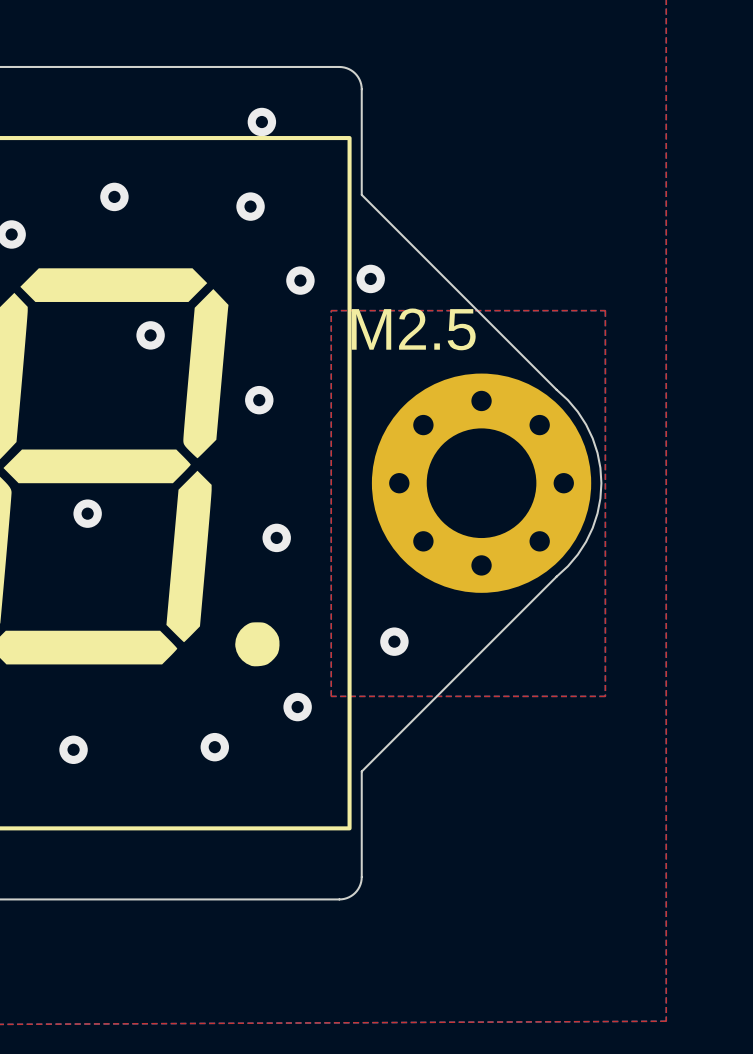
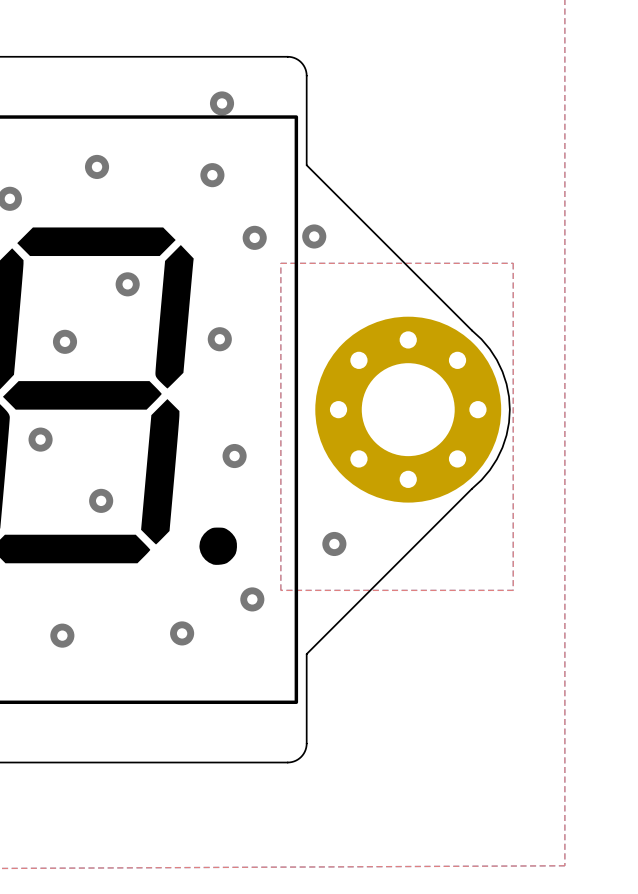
text: M2.5 (413, 329) -> none
via: none -> (65, 341)
via position: (87, 513) -> (40, 439)
via: none -> (101, 500)

